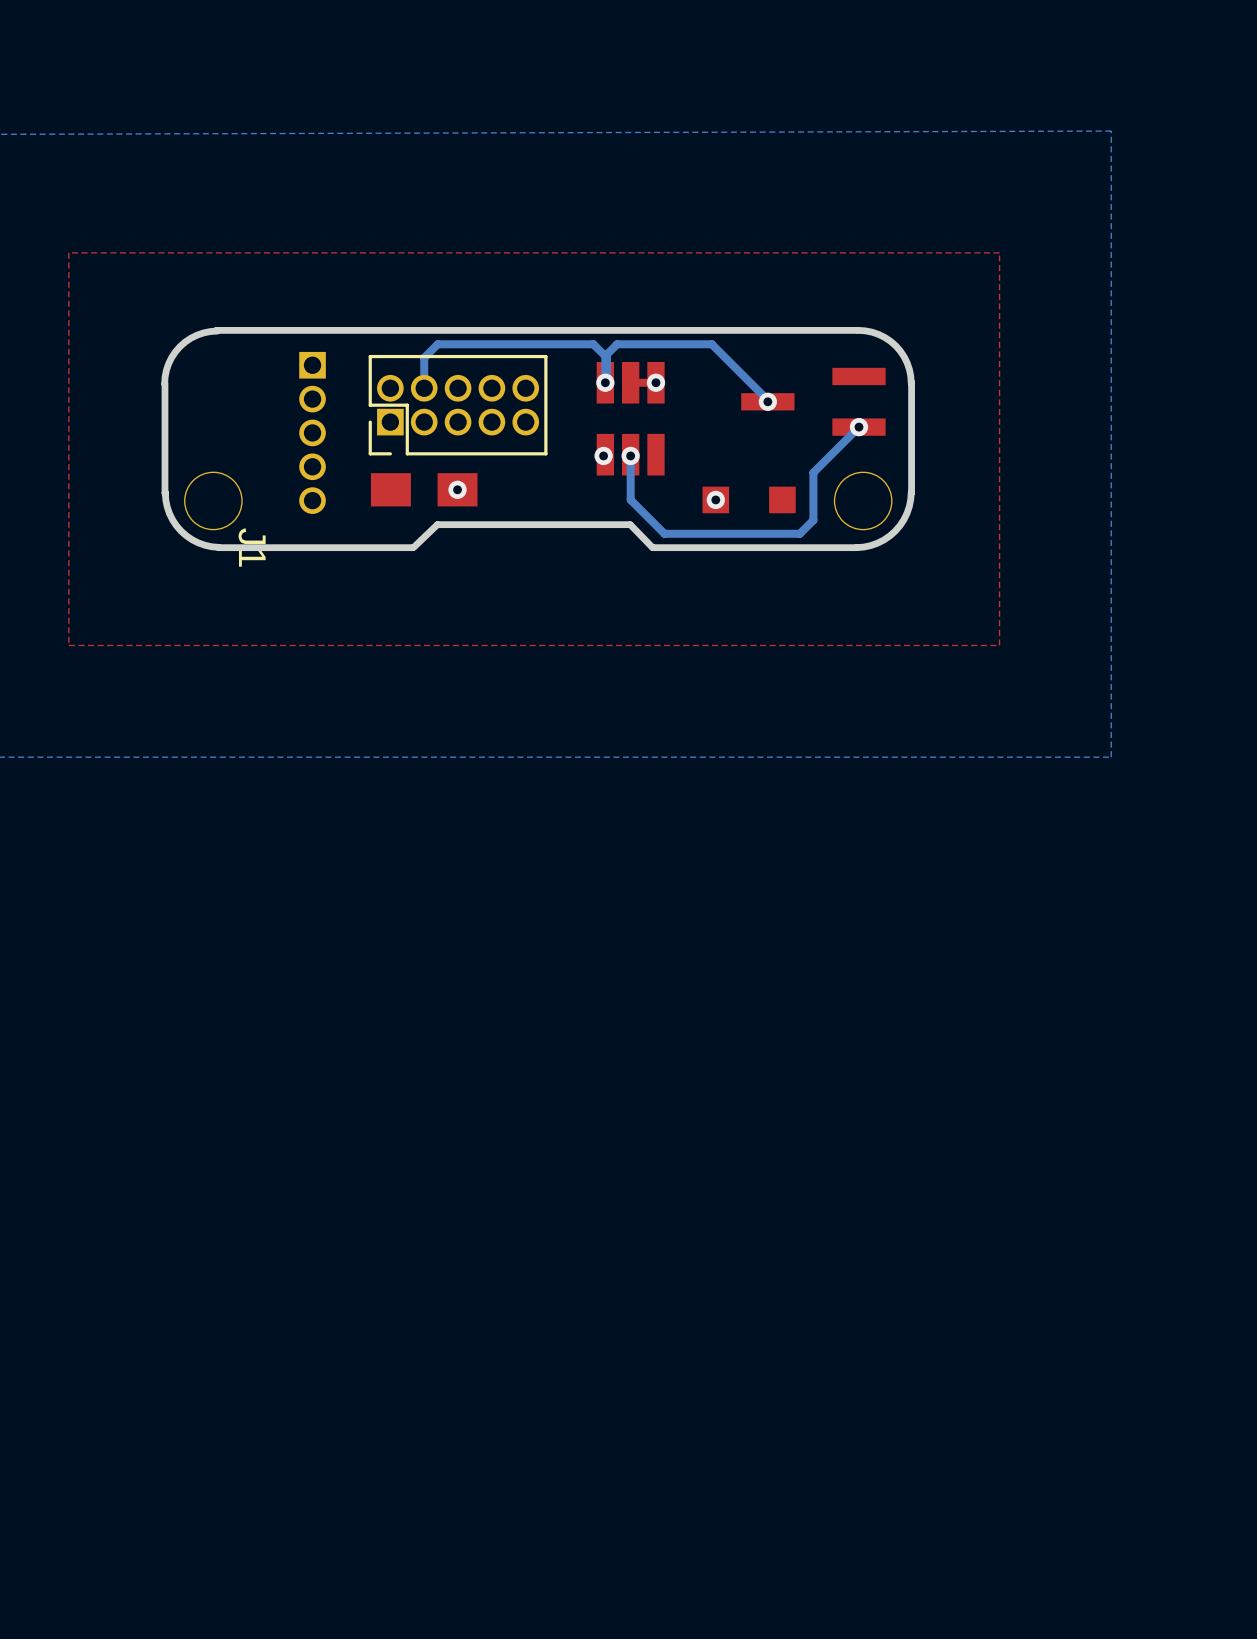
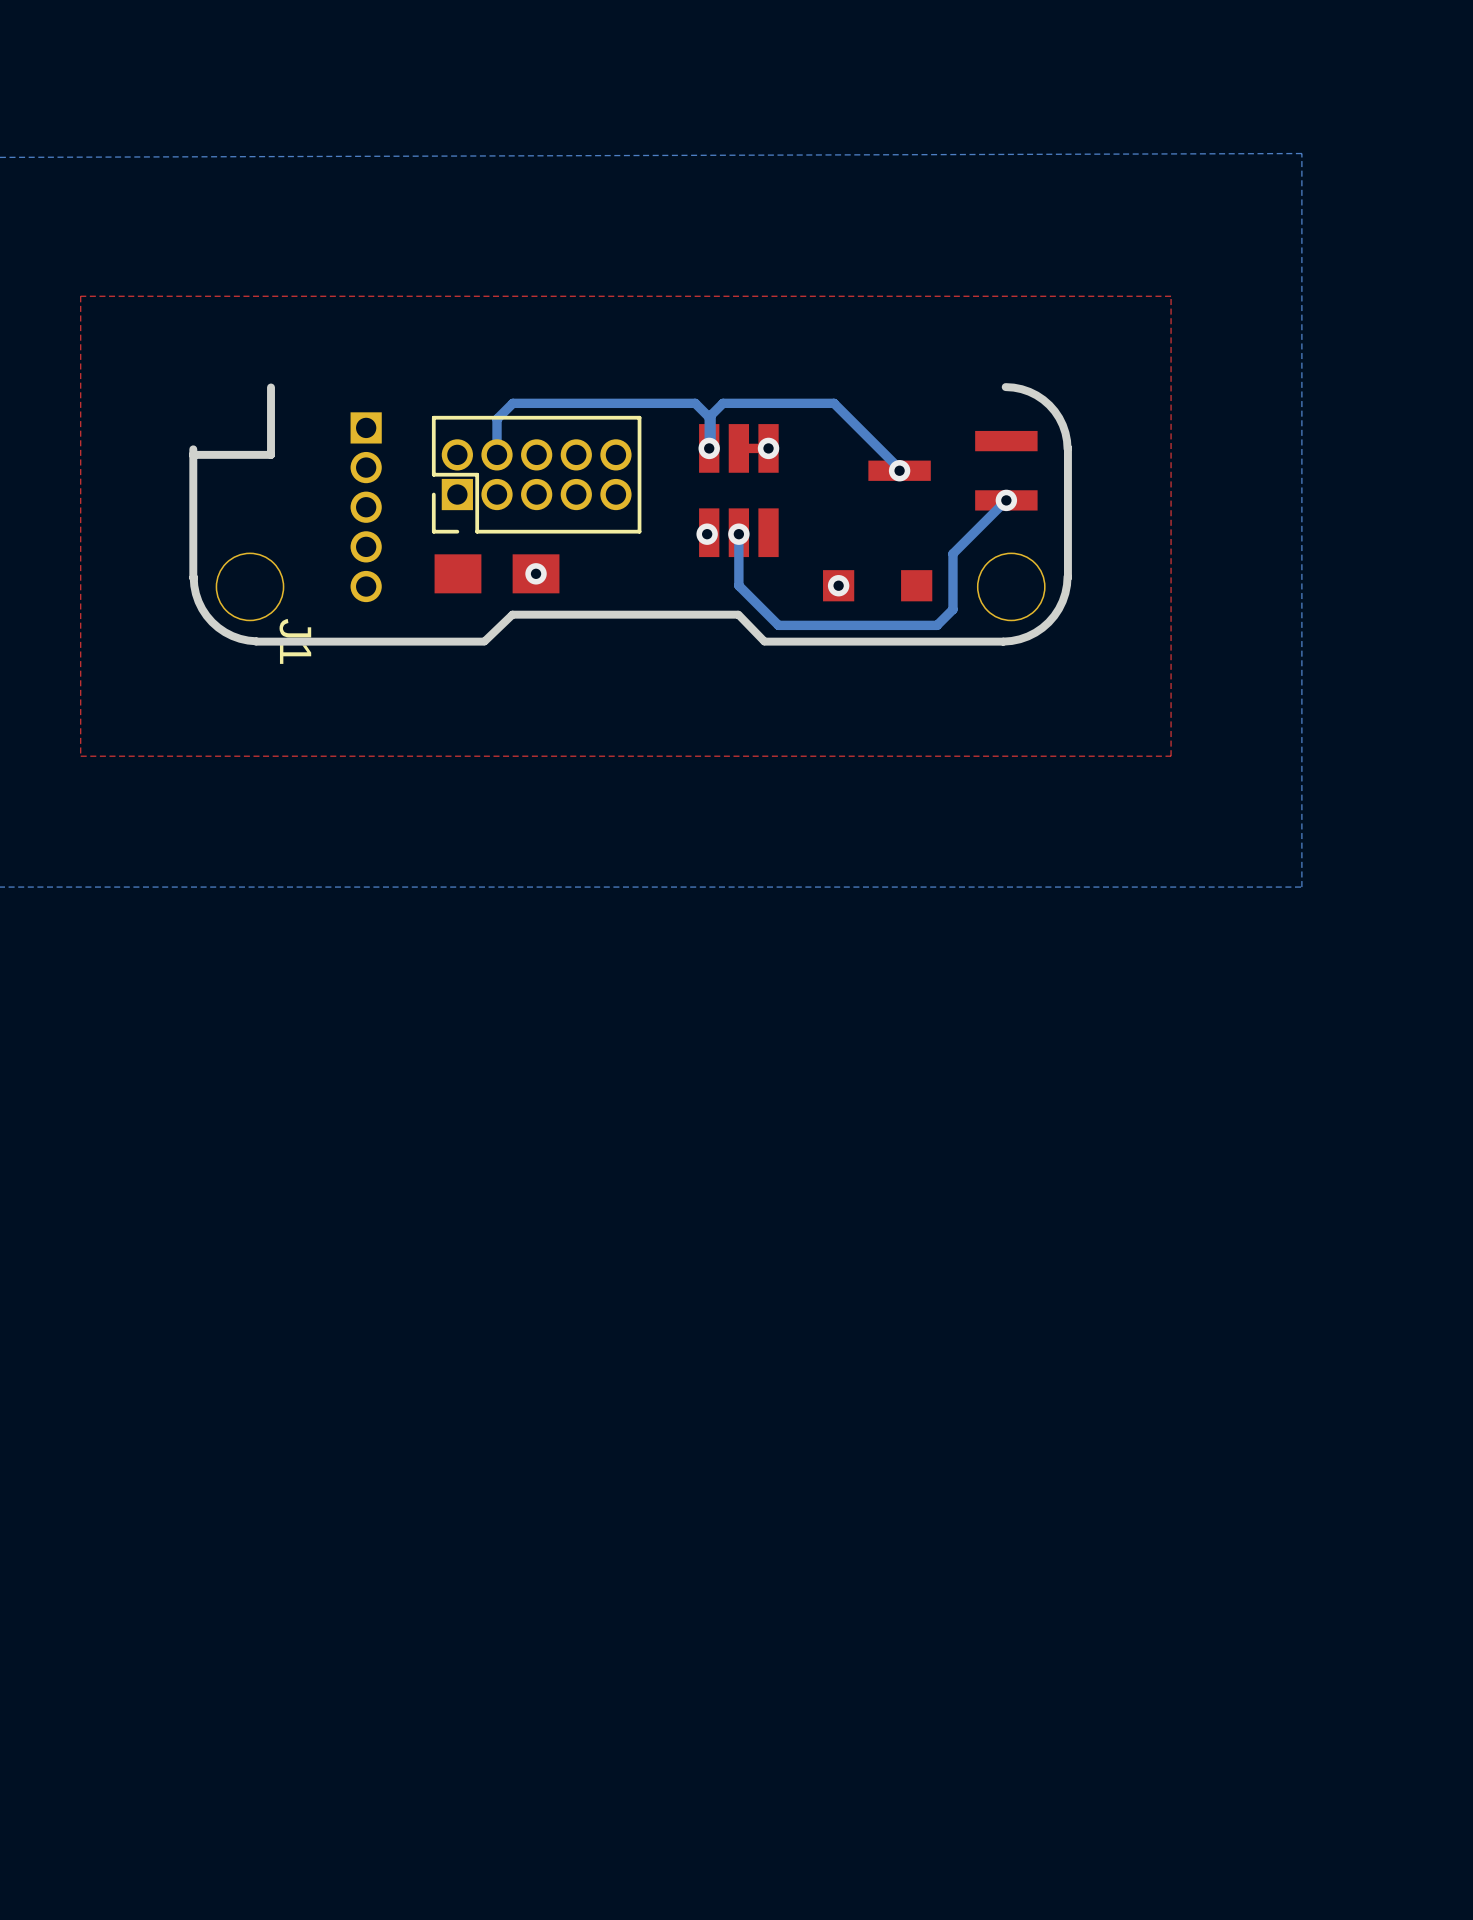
board edge: none -> (271, 387) (271, 454) (192, 454)
board edge: (856, 330) (216, 330) -> none
board edge: (217, 331) (197, 335) (180, 346) (168, 363) (164, 383) -> none

